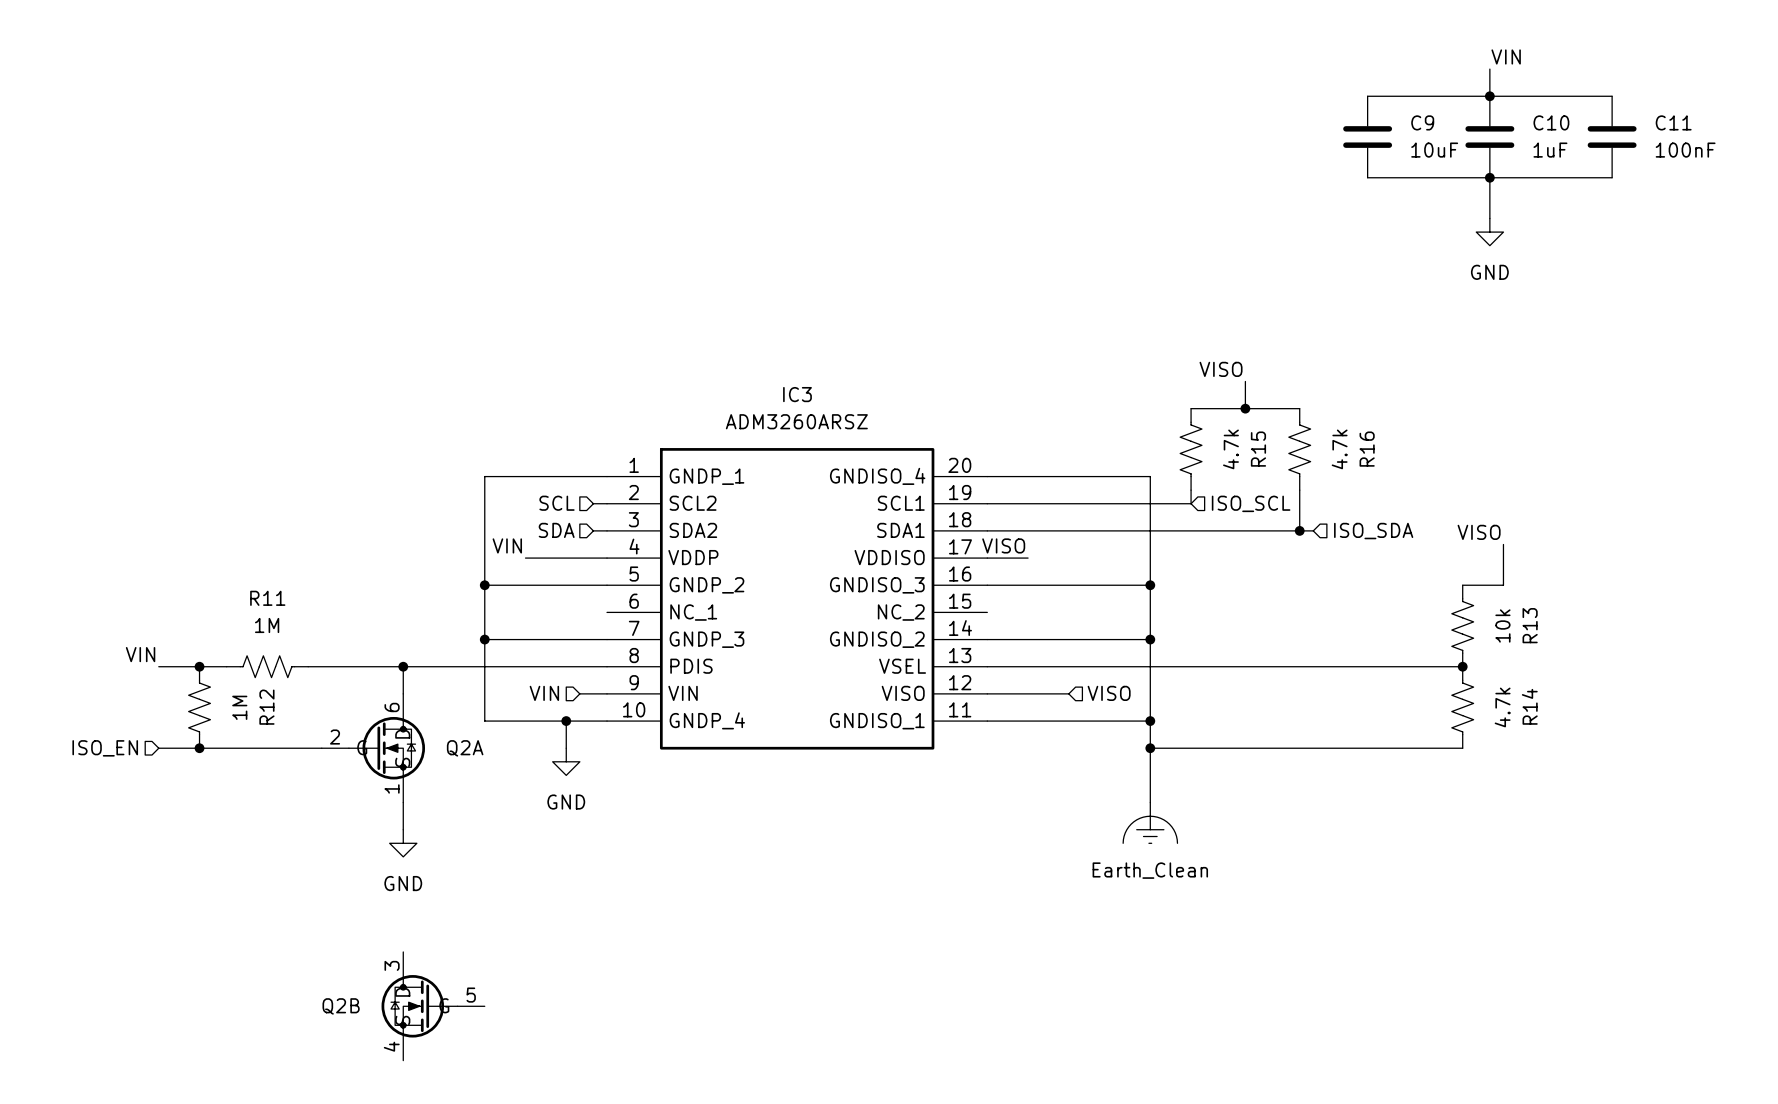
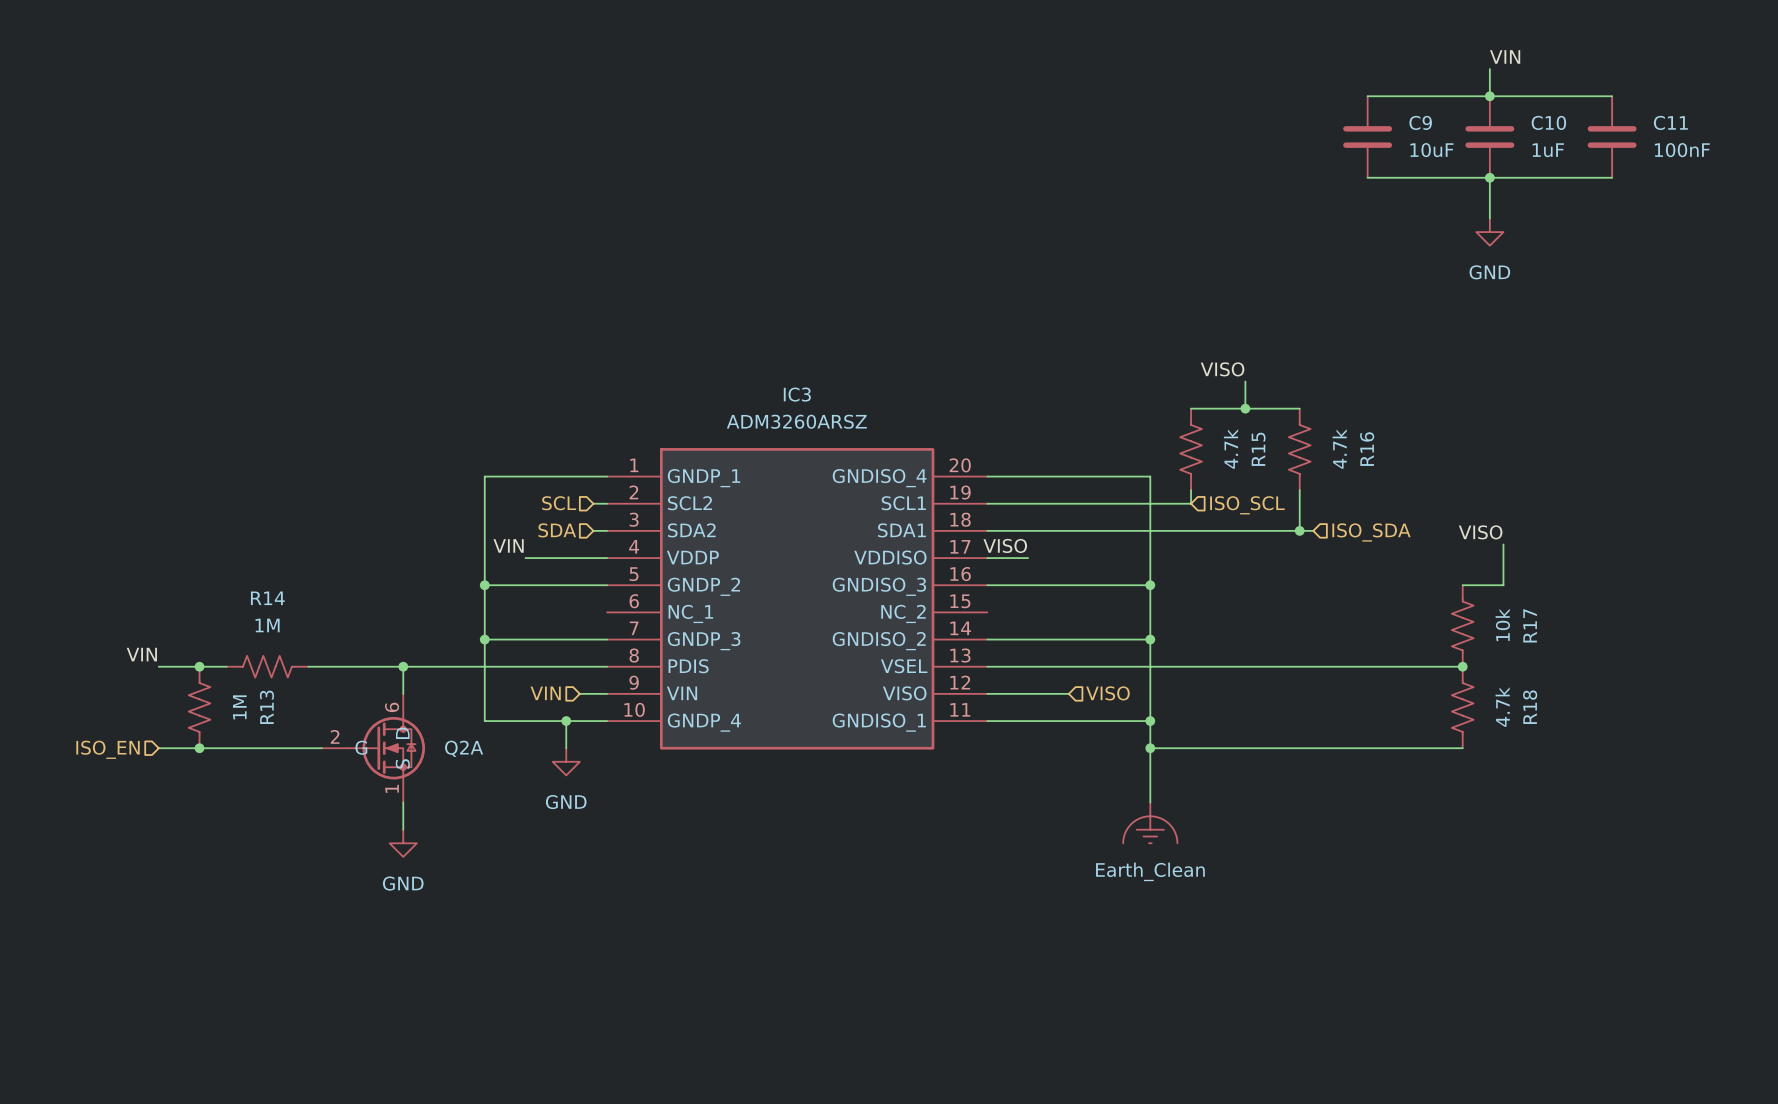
R11 name: R11 (267, 598) -> R14 (267, 598)
R13 name: R13 (1530, 625) -> R17 (1530, 625)
R14 name: R14 (1529, 706) -> R18 (1530, 707)
R12 name: R12 (266, 707) -> R13 (266, 707)
Q2B: (433, 1006) -> none

